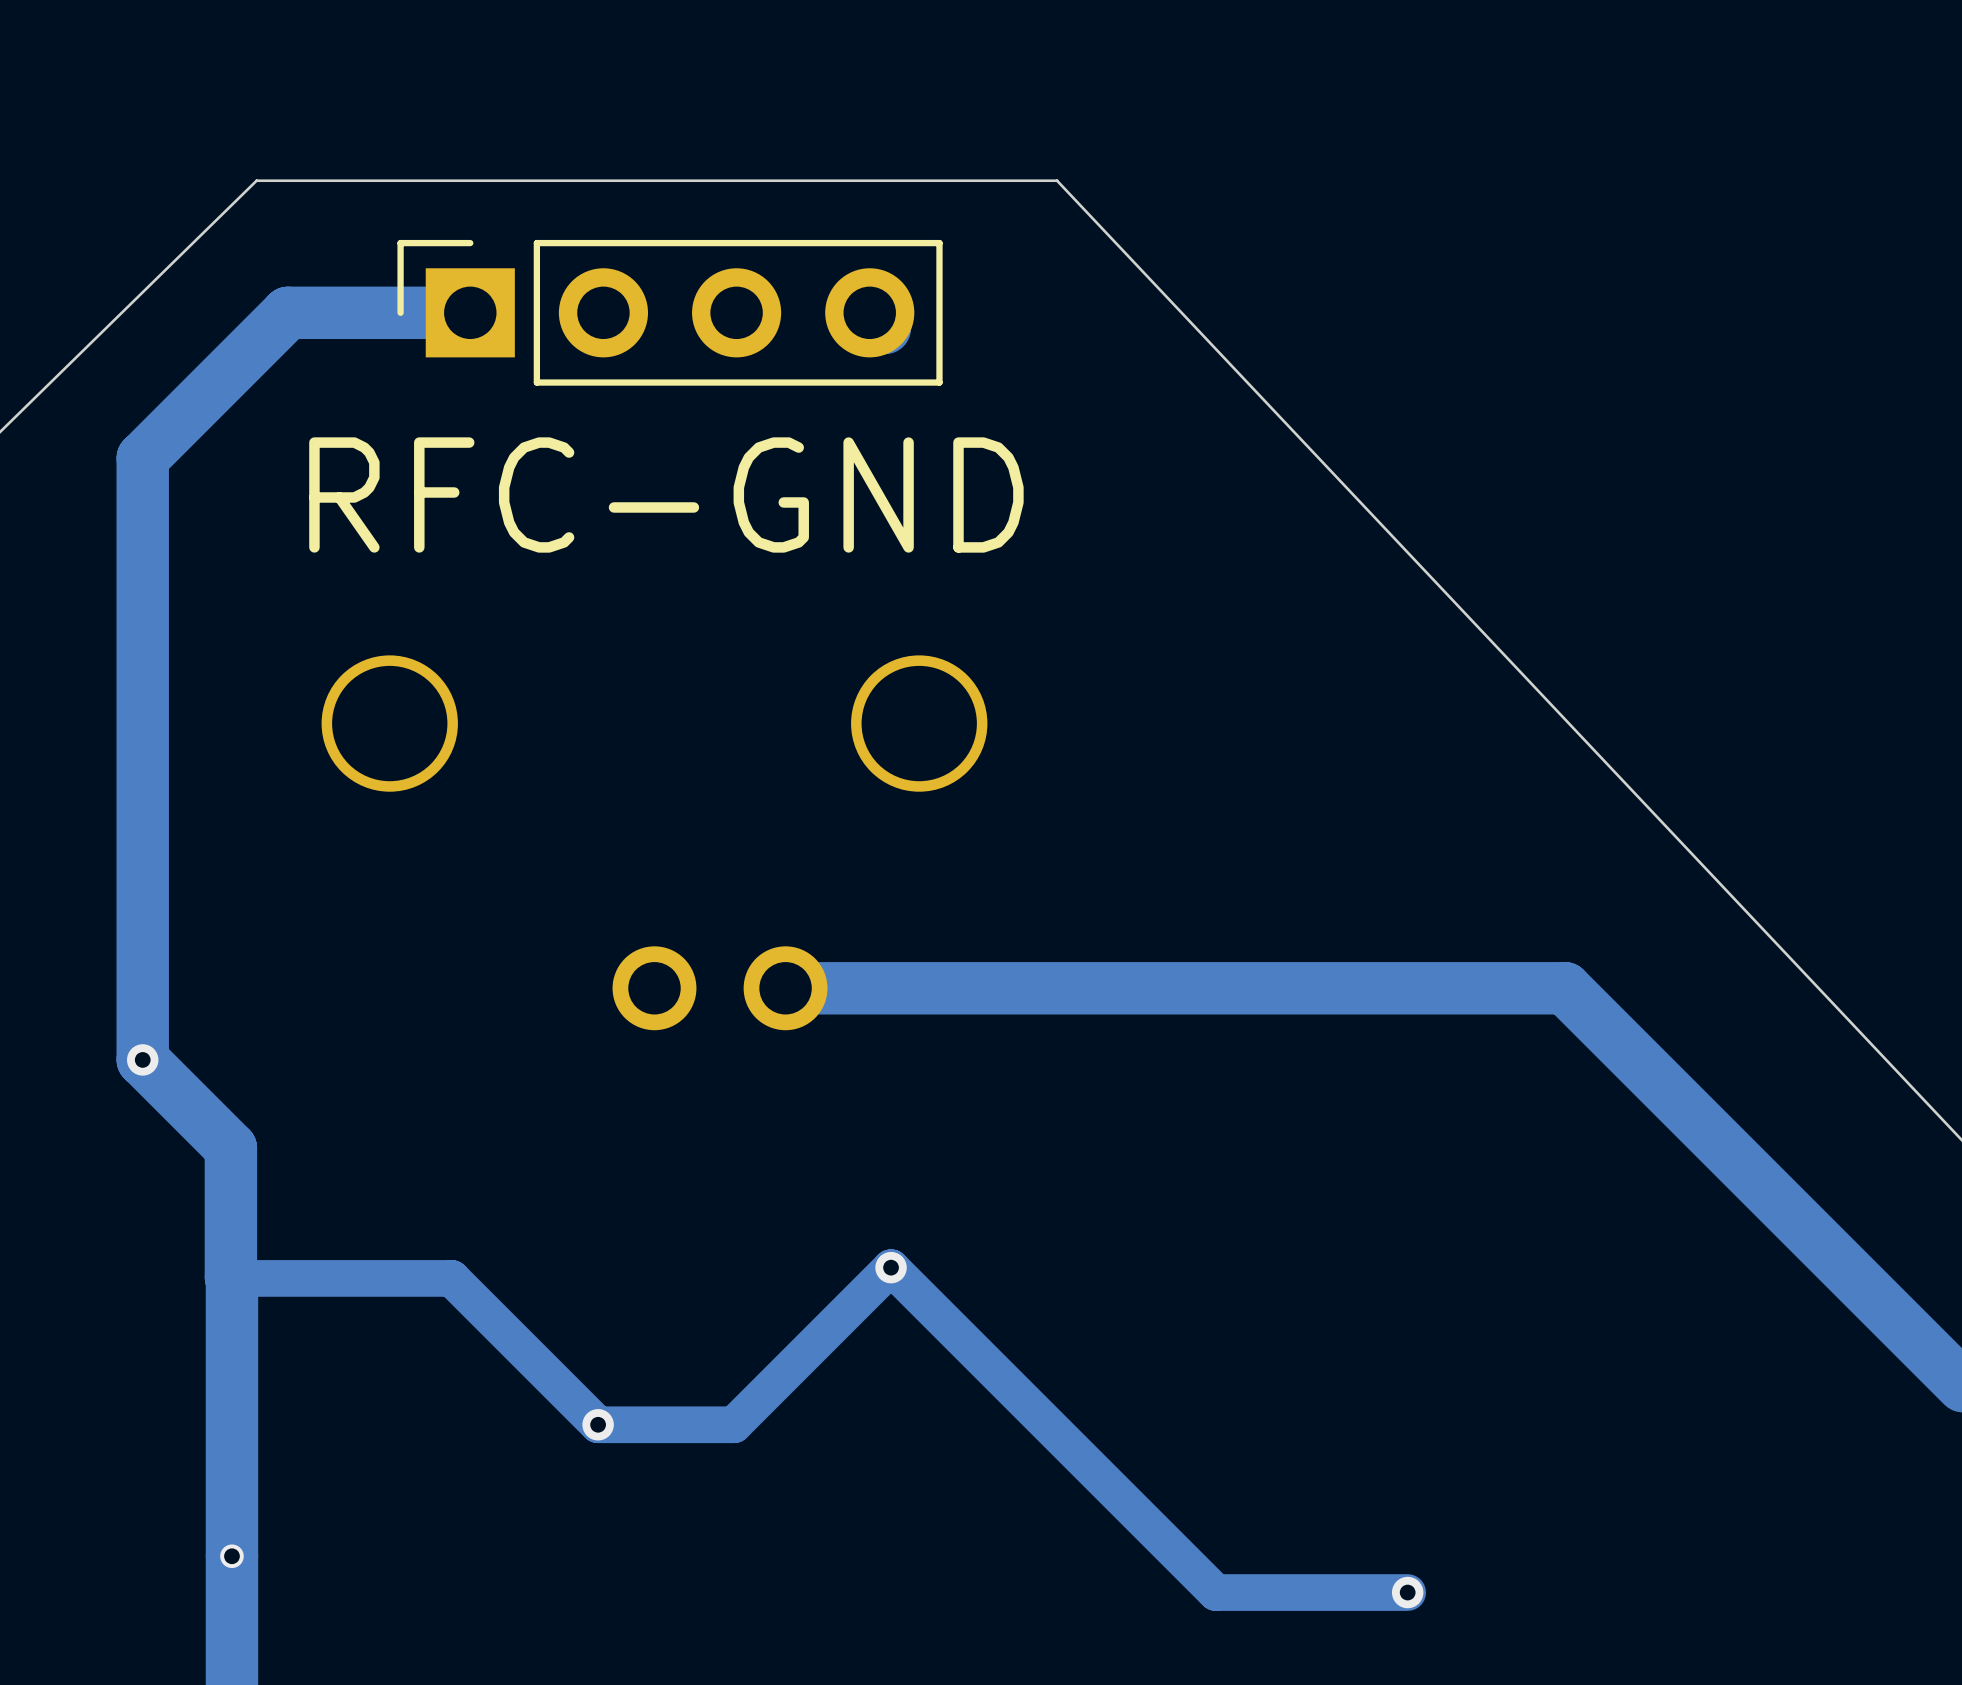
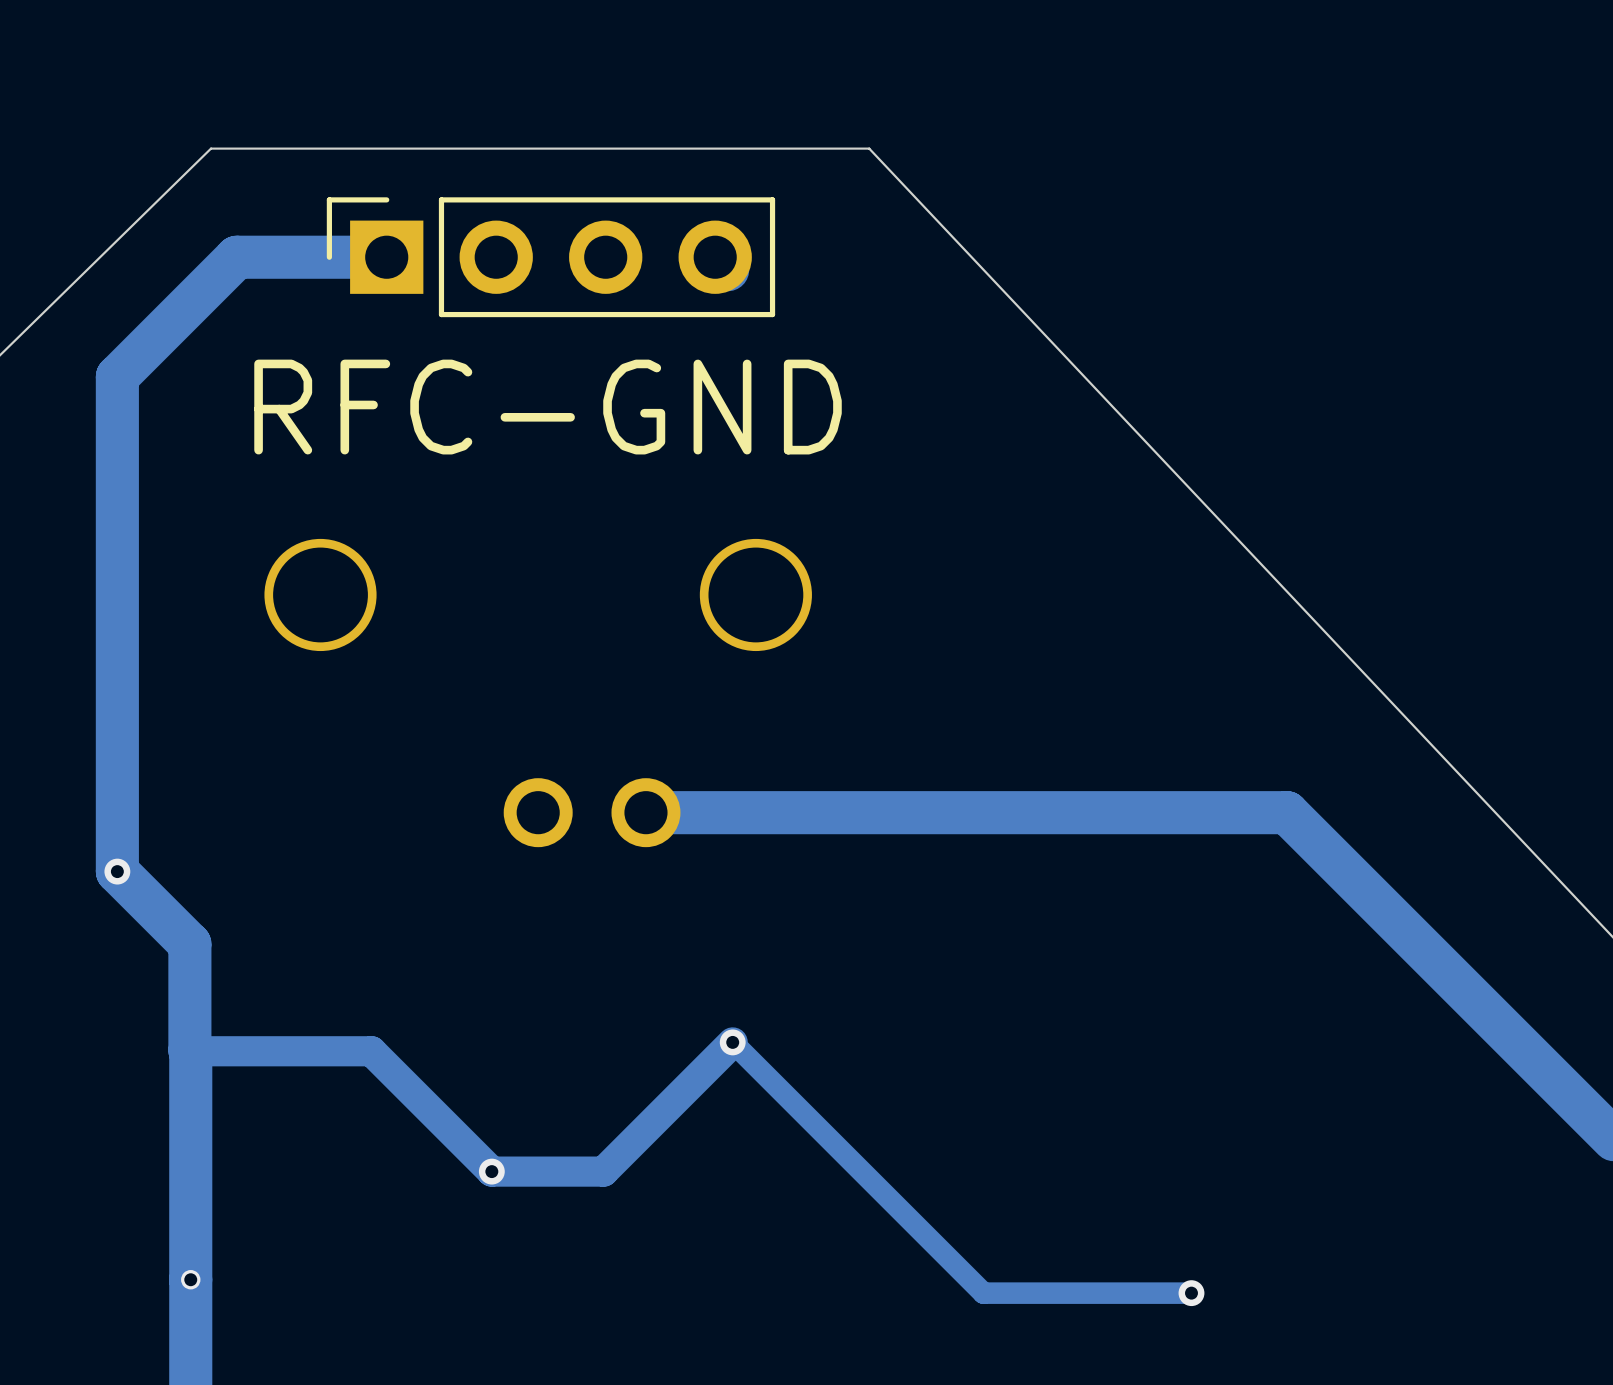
track width: thick (891, 1267) (1195, 1572) -> thin (732, 1042) (983, 1293)
track: (1195, 1572) (1215, 1592) (1407, 1592) -> (983, 1293) (1191, 1293)
via position: (1407, 1592) -> (1191, 1293)

